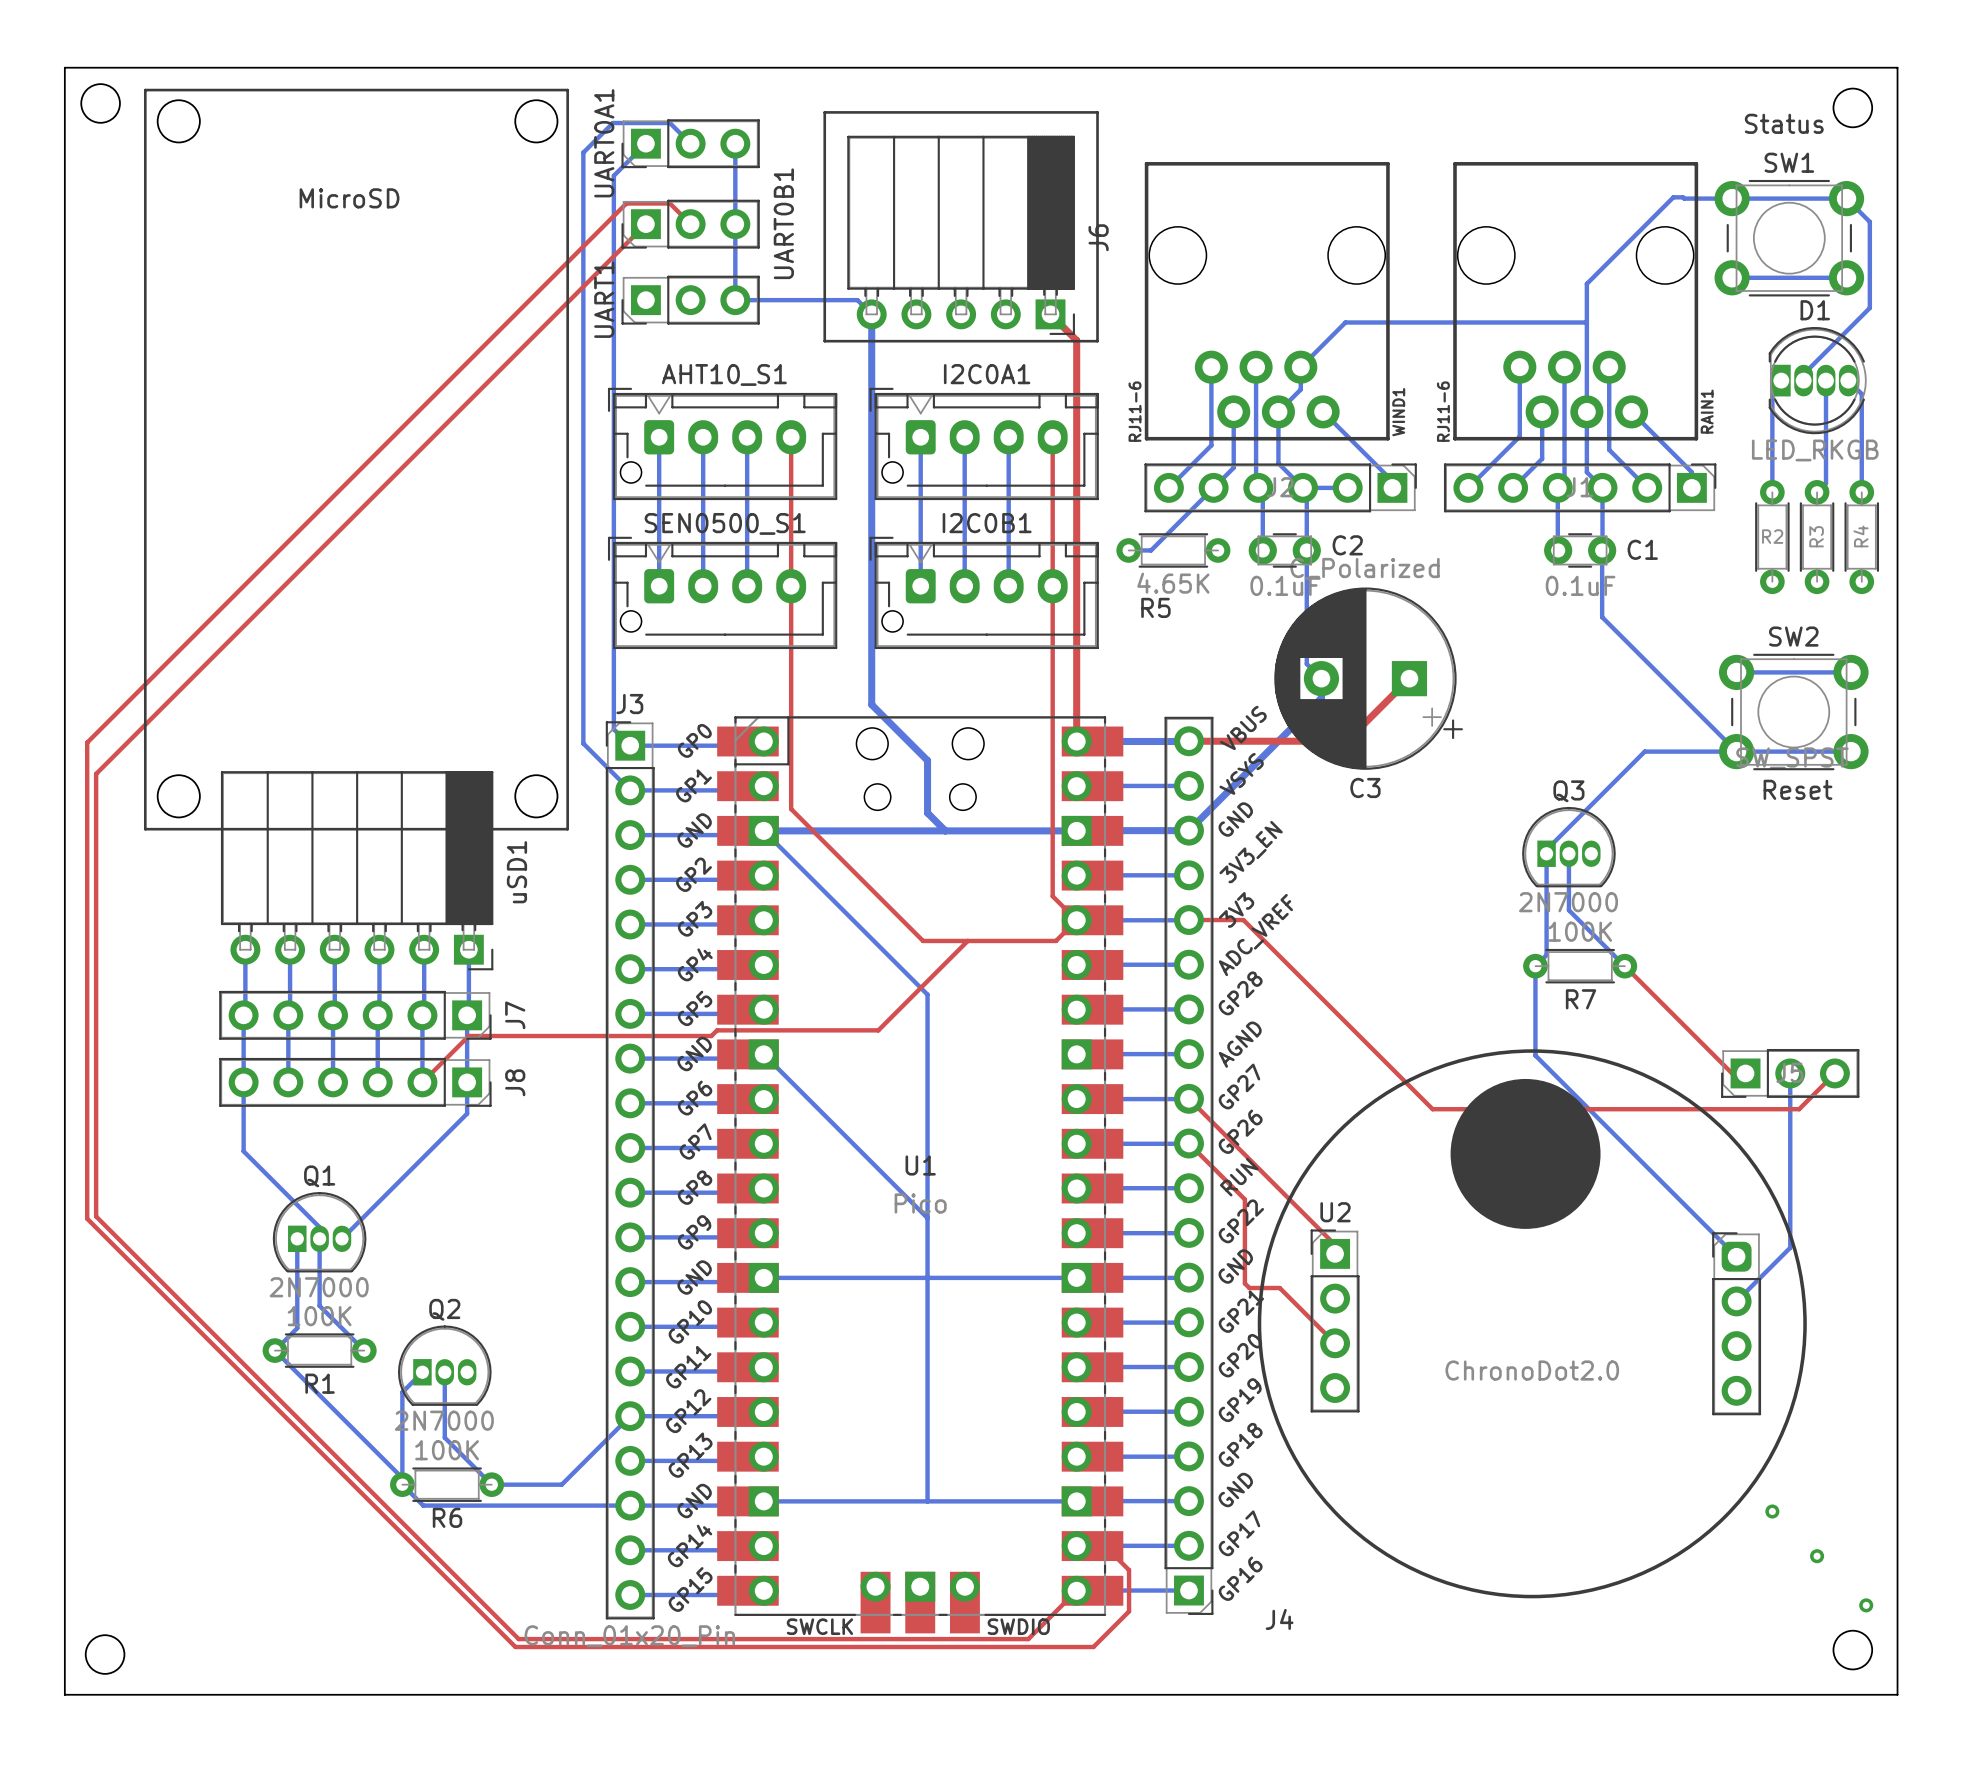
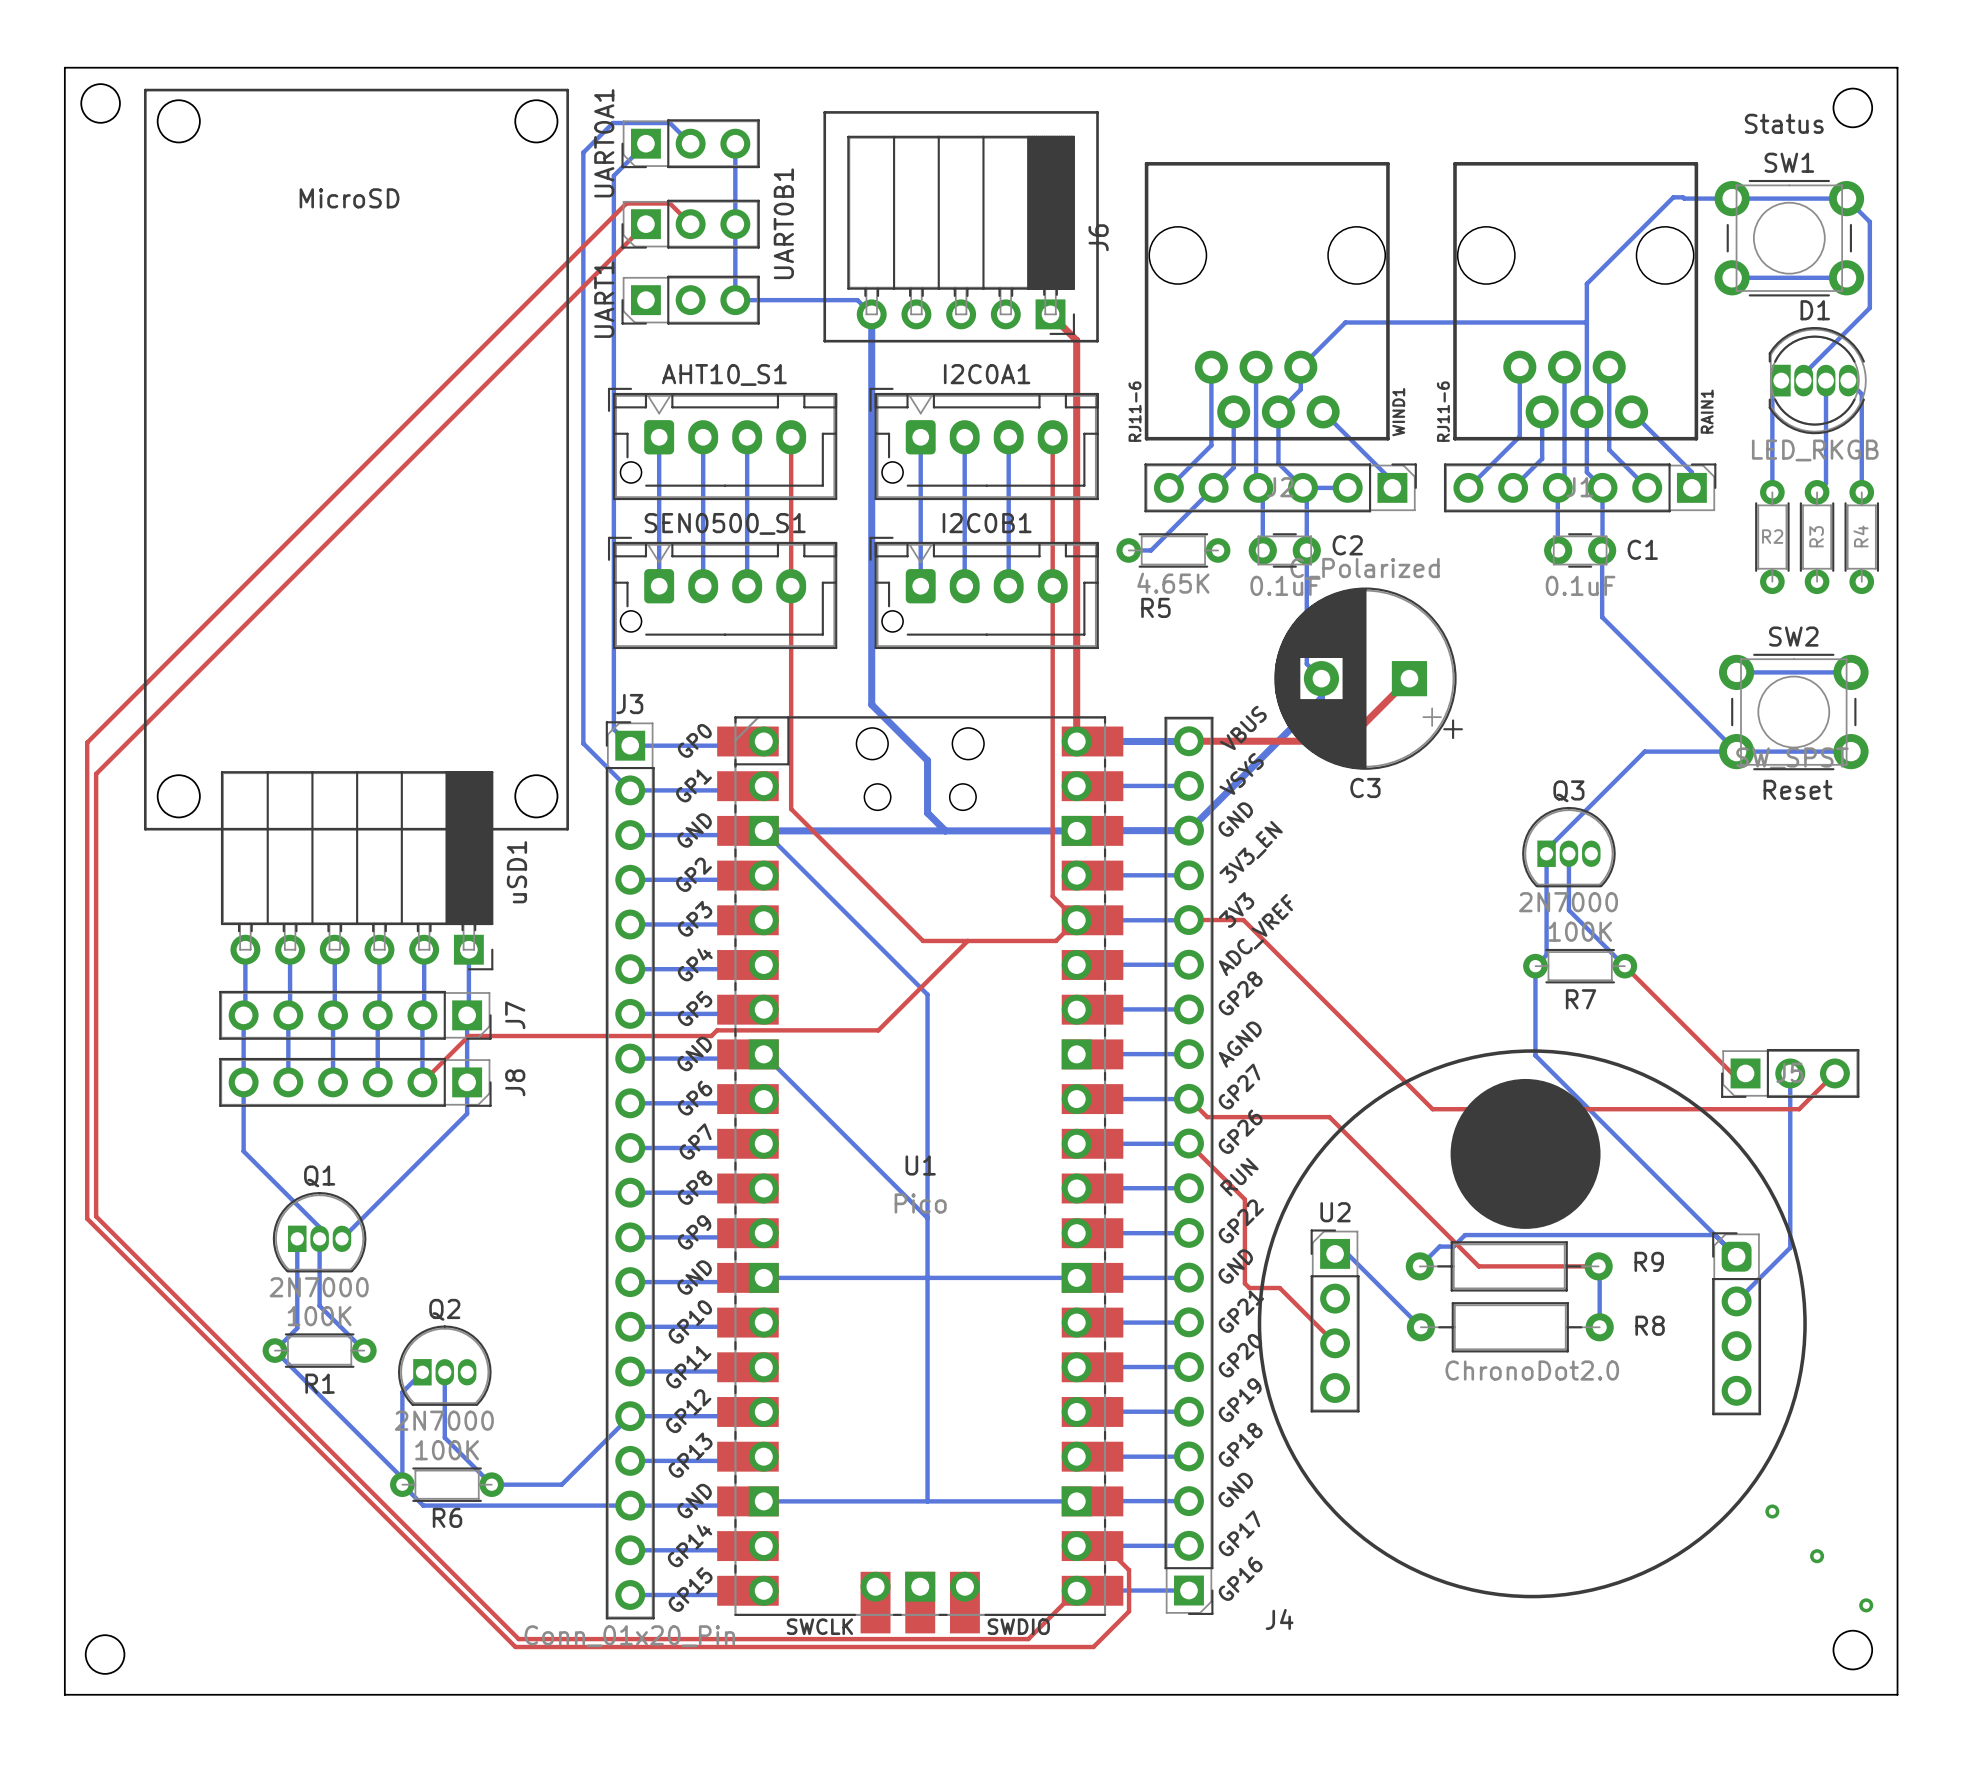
top track: (1207, 1117) (1335, 1244) -> (1207, 1117) (1329, 1117) (1478, 1266) (1598, 1266)
bottom track: none -> (1714, 1235) (1465, 1235) (1453, 1246) (1439, 1246) (1419, 1266)
bottom track: none -> (1335, 1253) (1347, 1253) (1420, 1327)
R9: none -> (1509, 1266)
bottom track: none -> (1598, 1266) (1599, 1327)
R8: none -> (1510, 1327)

